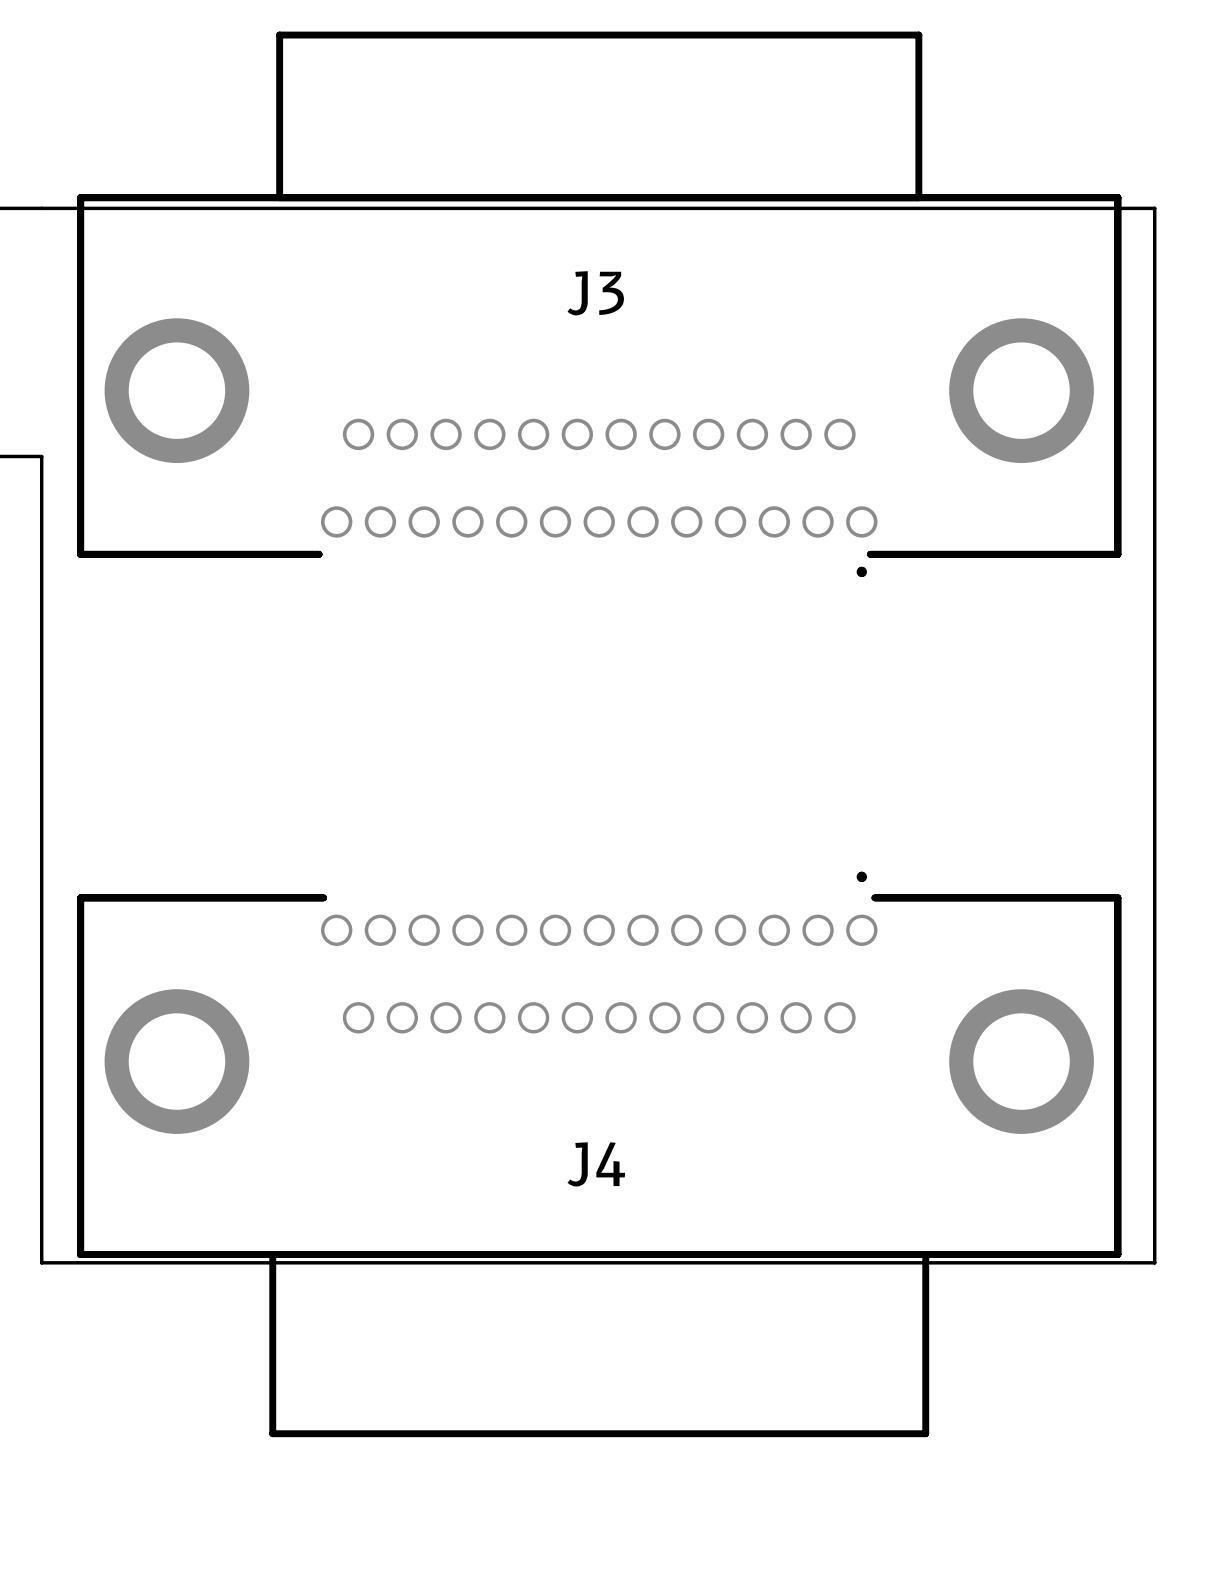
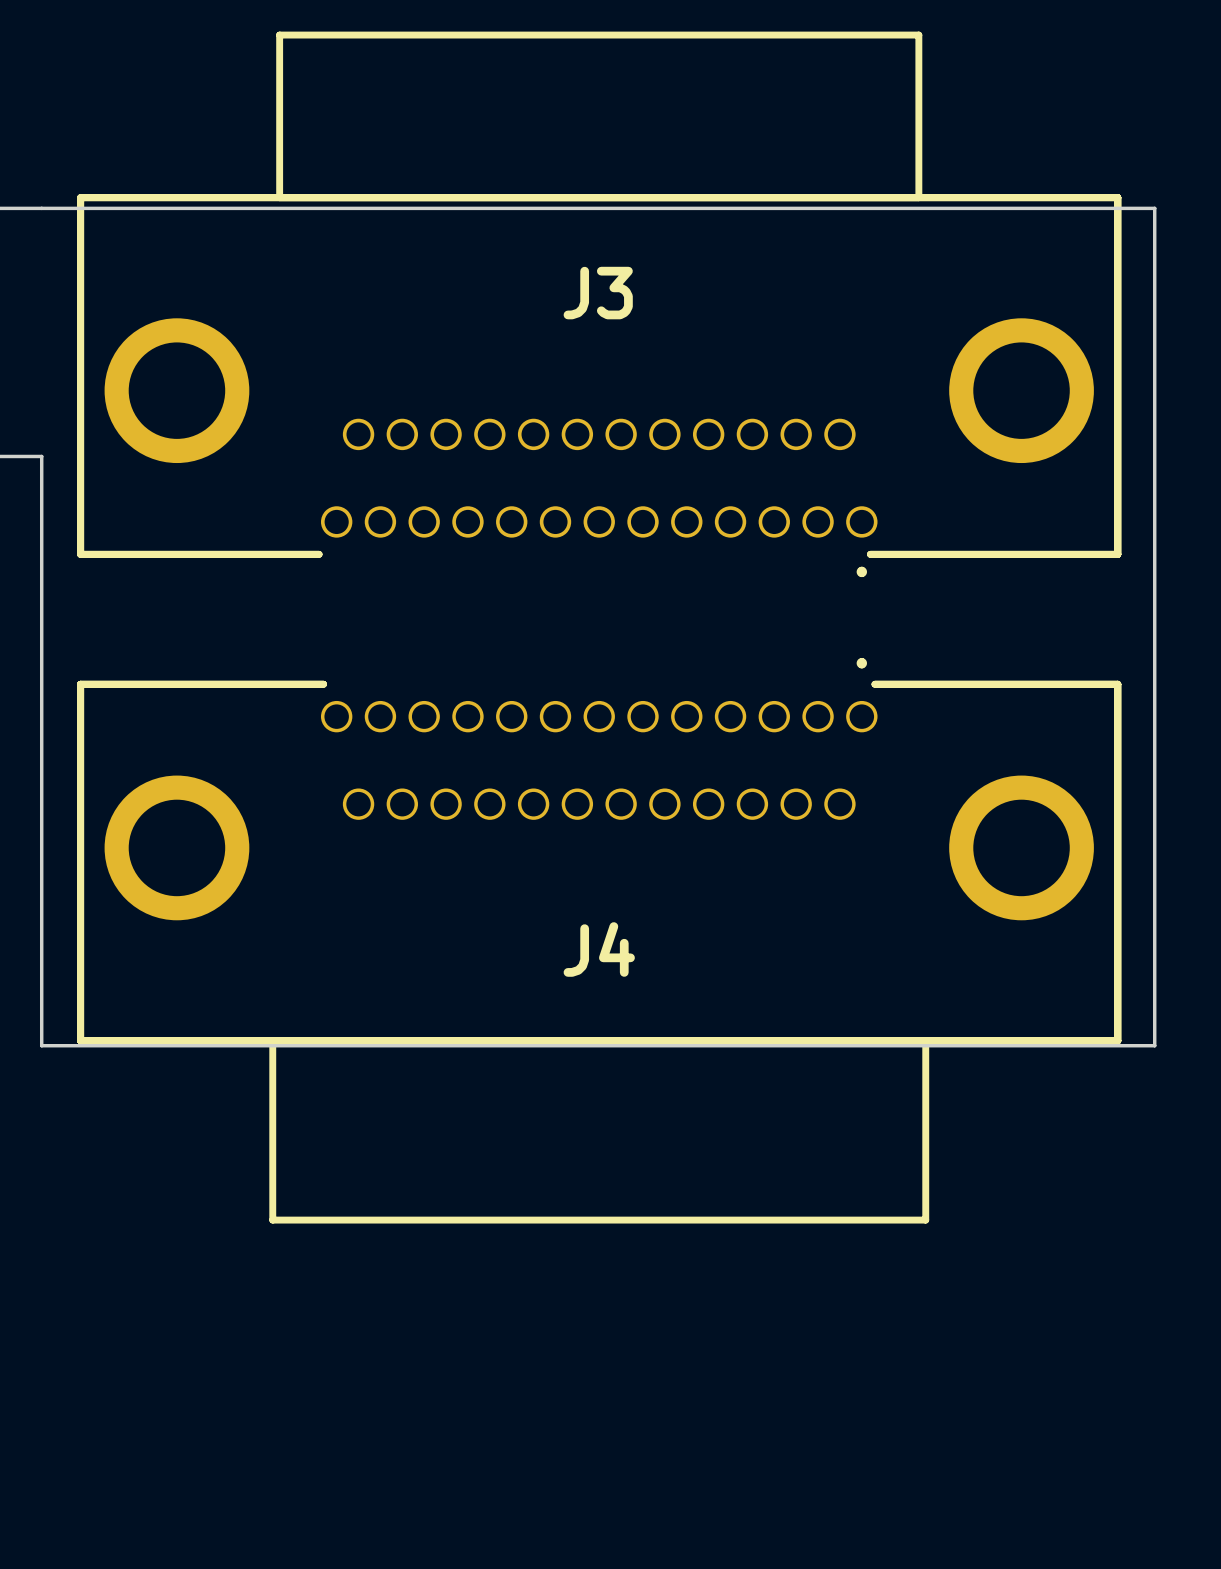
board edge: (41, 1045) (41, 1262) (1154, 1262) (1154, 1045) -> (41, 1045) (1154, 1045)
J4 position: (599, 1154) -> (599, 940)

